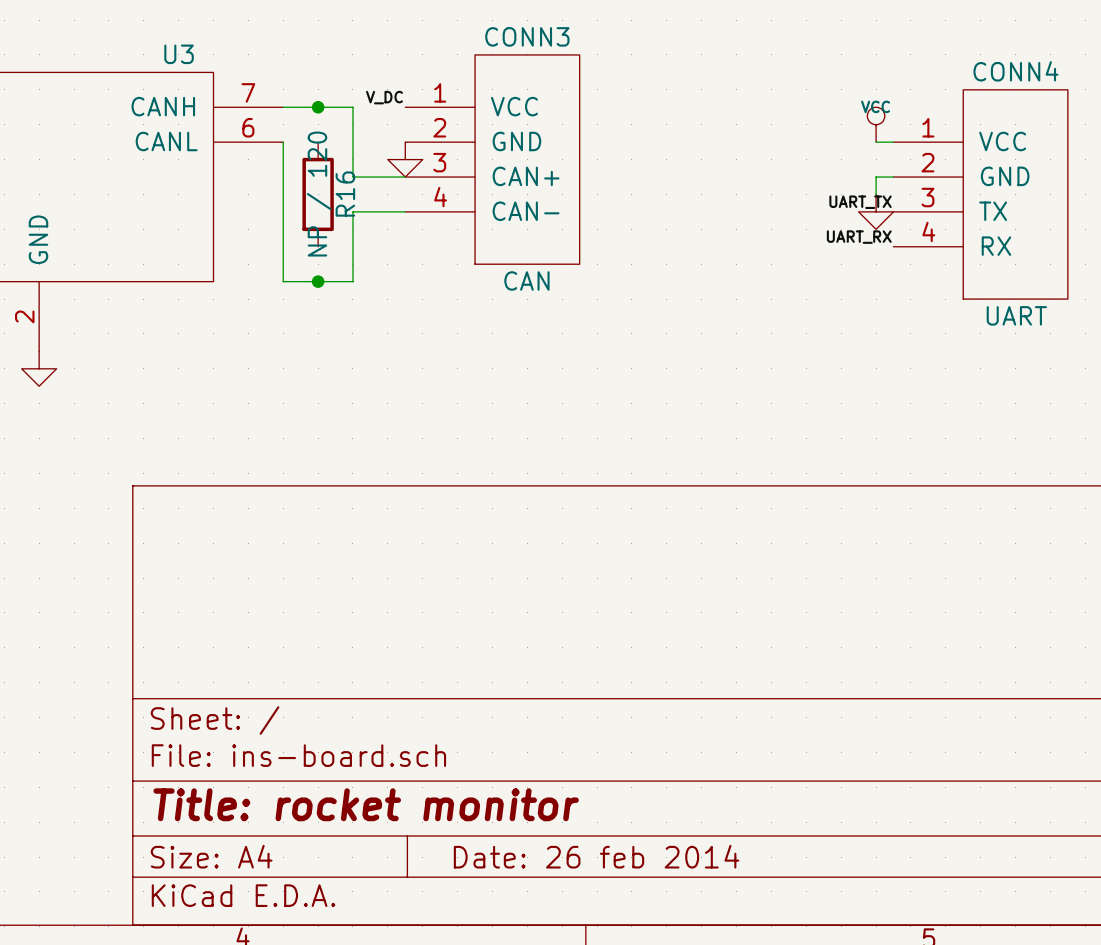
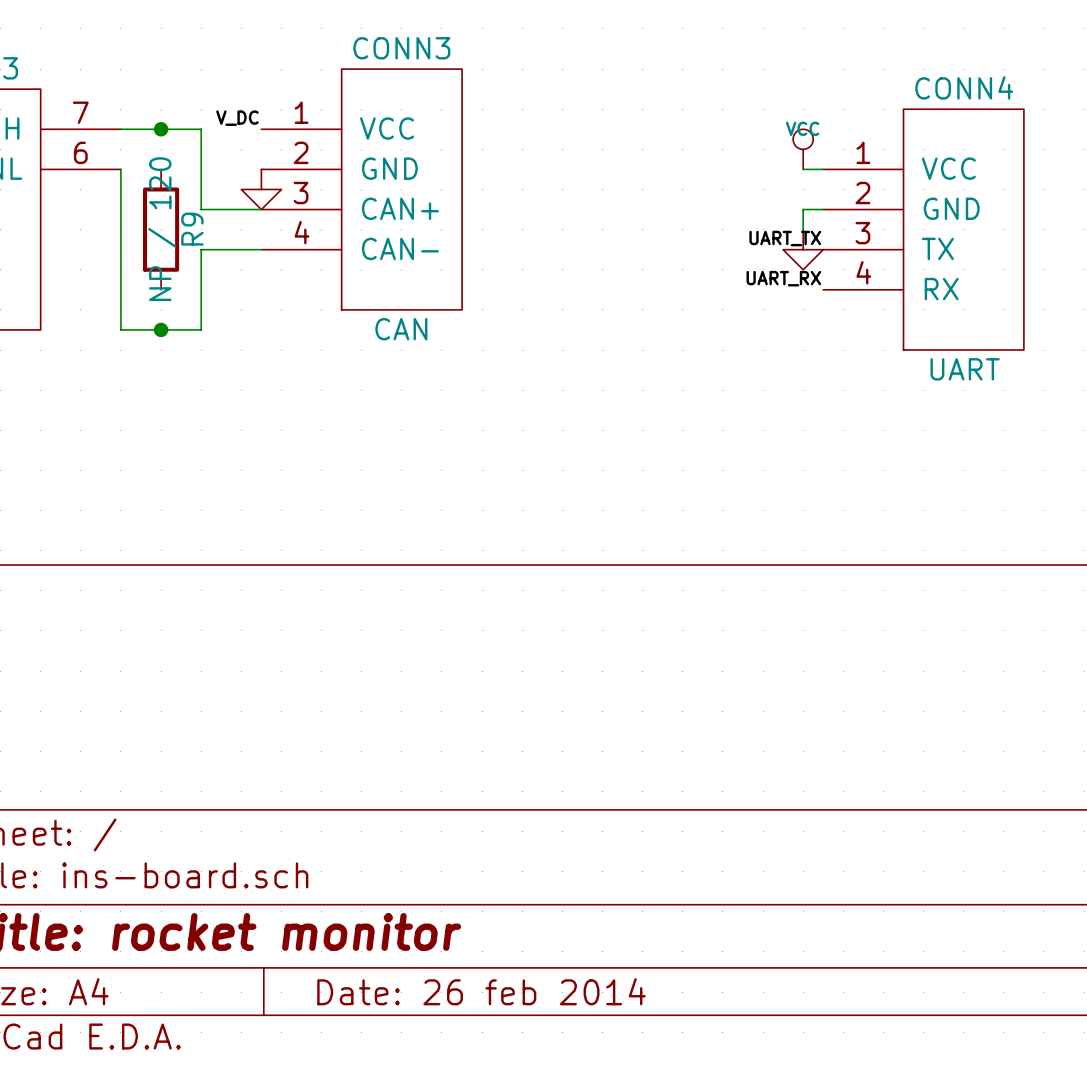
R16 name: R16 (345, 194) -> R9 (192, 229)

